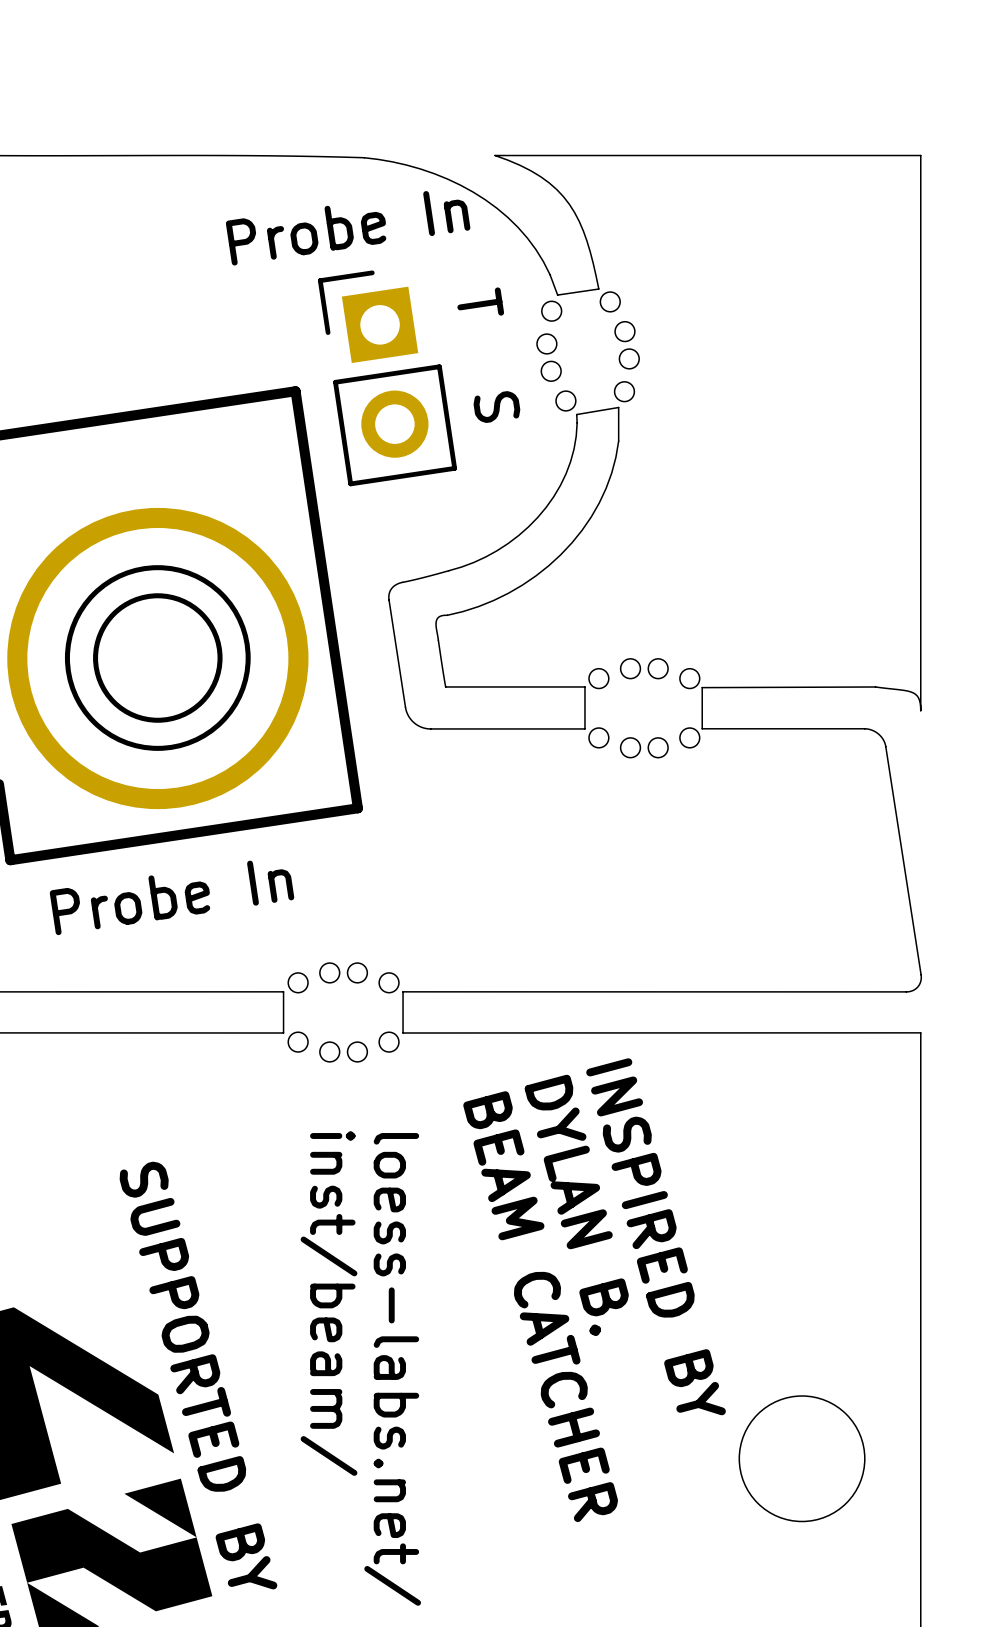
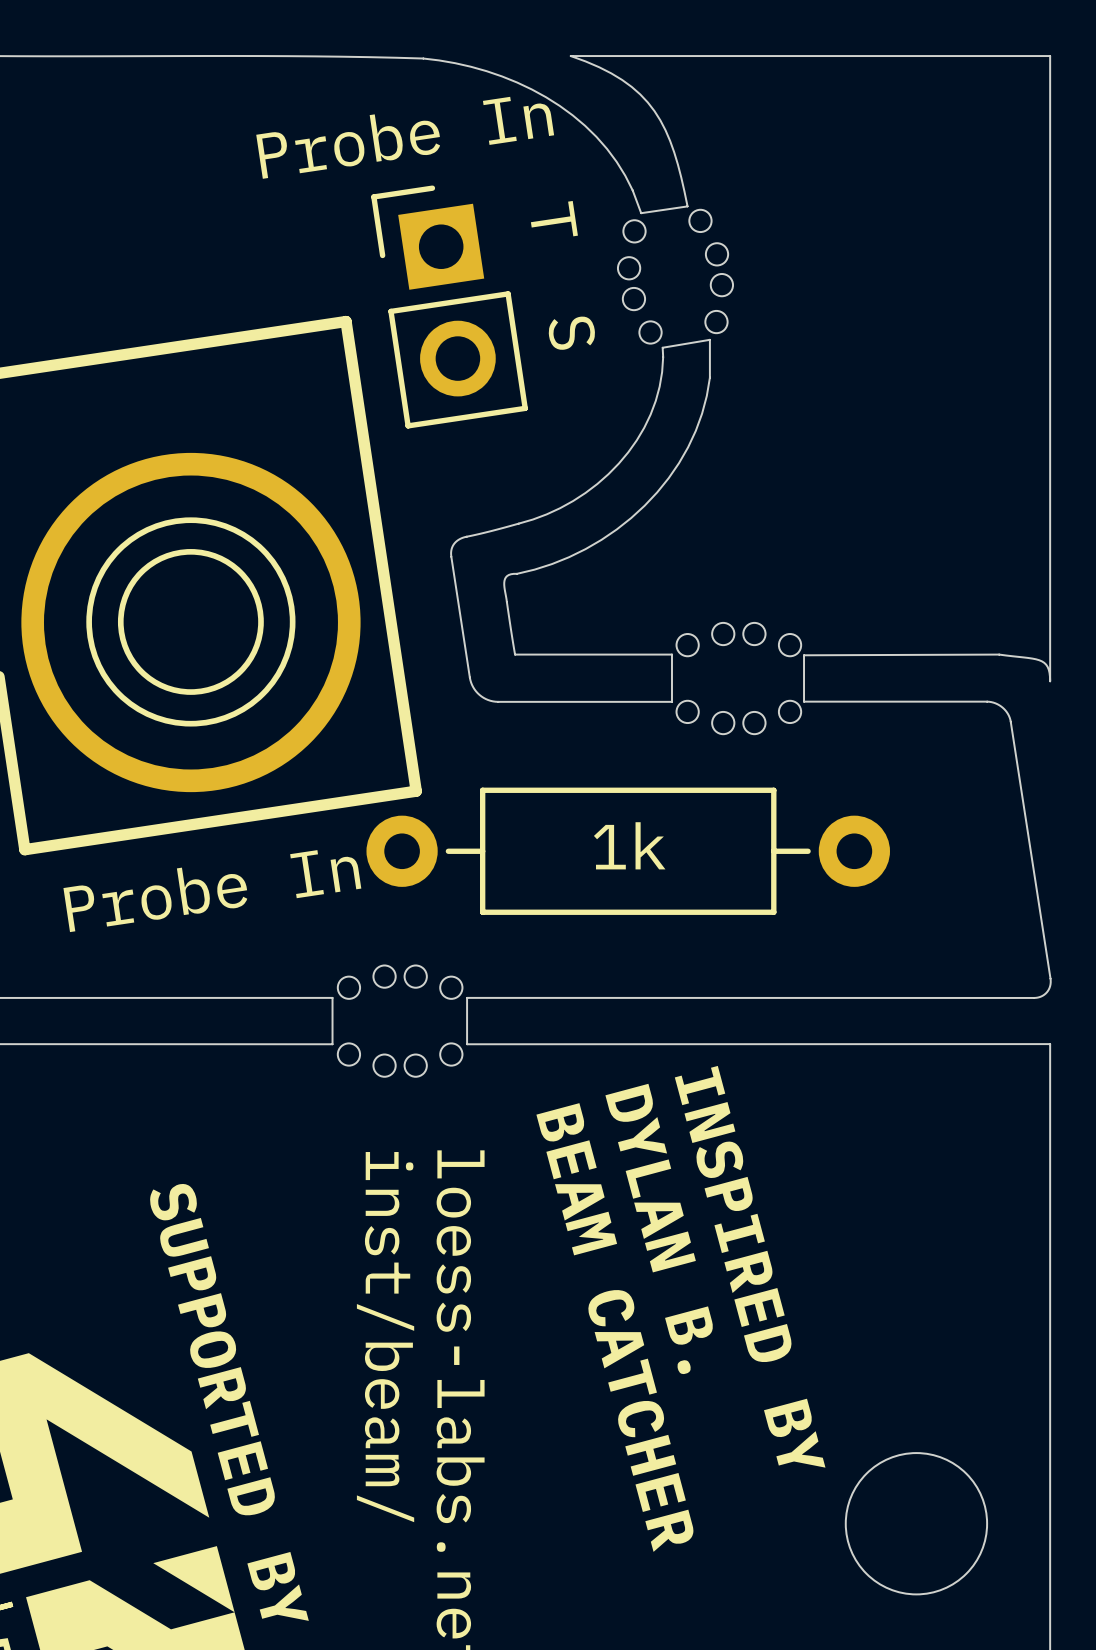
part: none -> 1k (628, 851)

